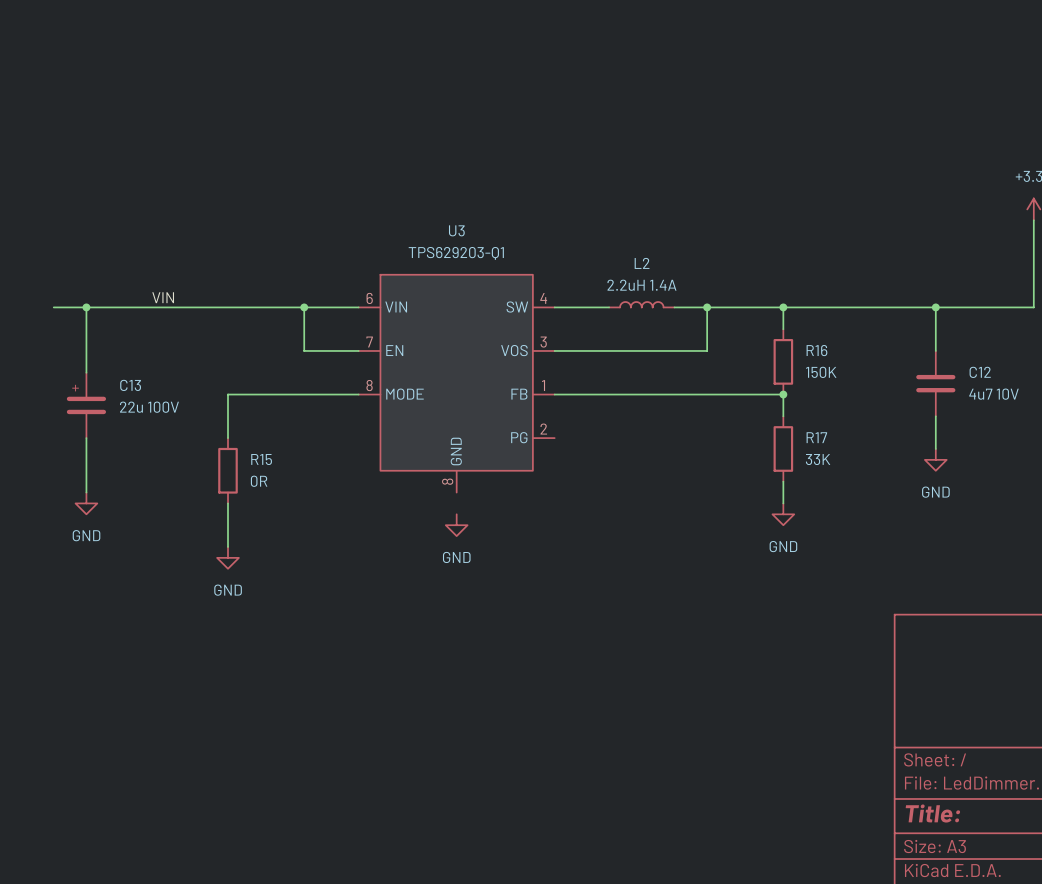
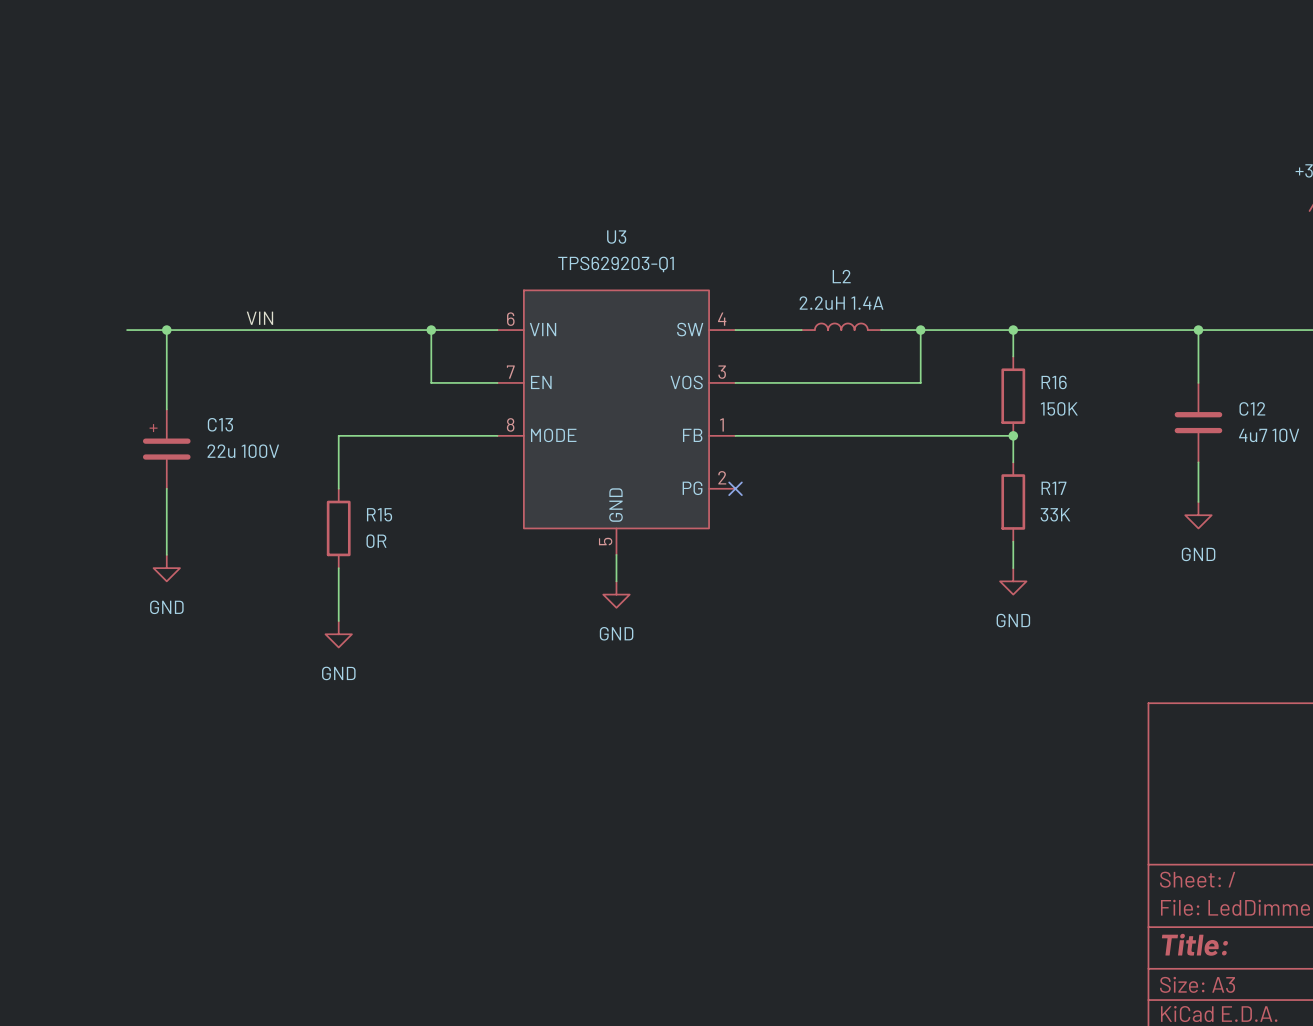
no-connect mark: none -> (735, 488)
U3 pin number: 8 (447, 481) -> 5 (605, 541)
wire: none -> (616, 554) (616, 581)

